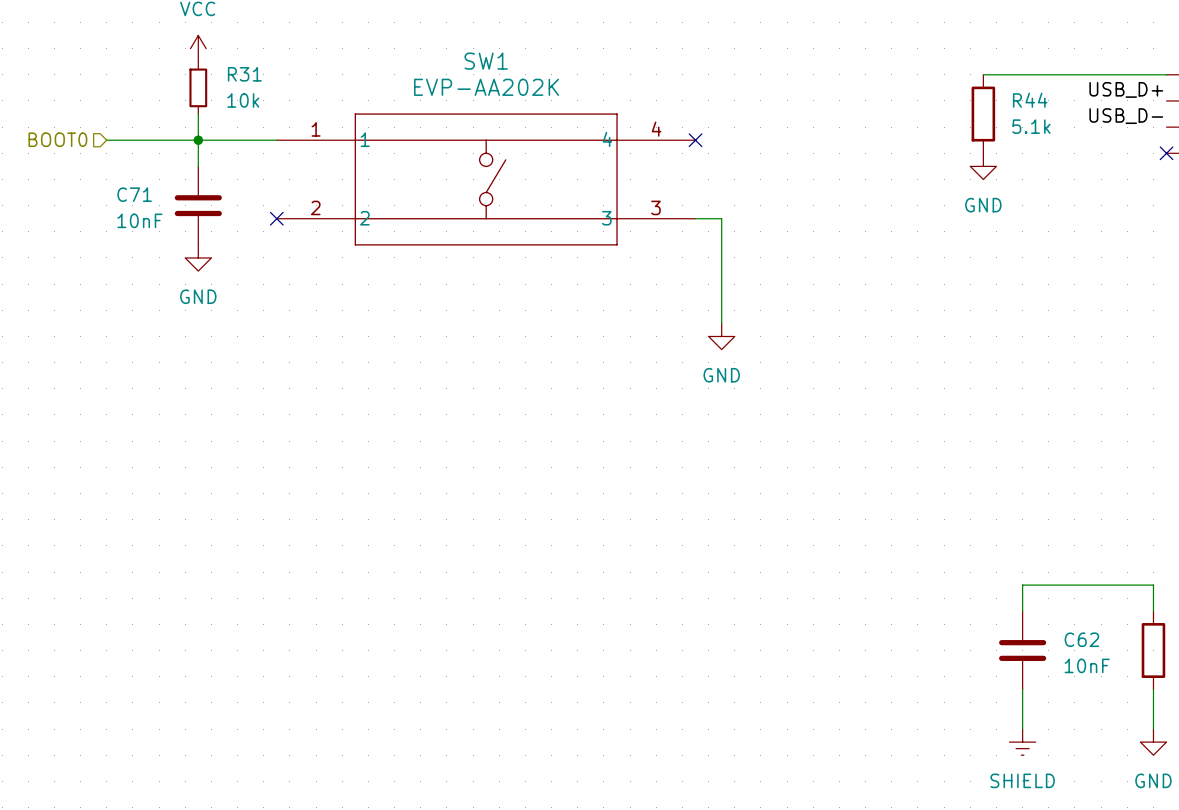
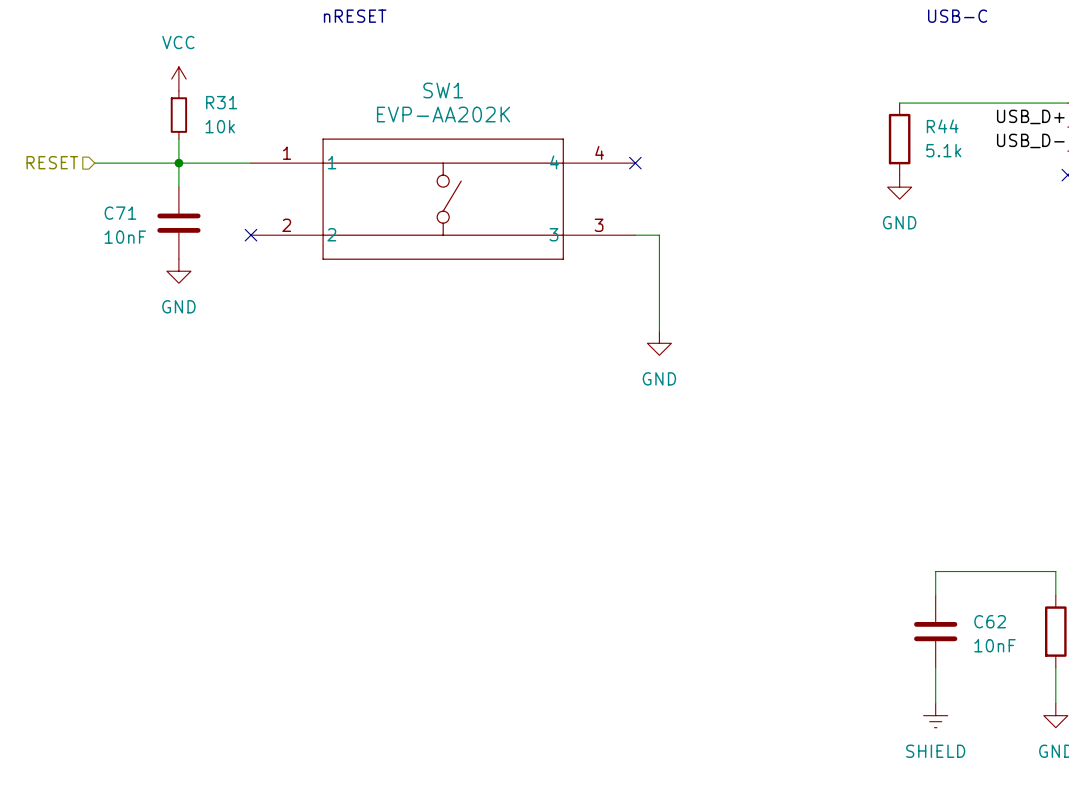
hierarchical label: BOOT0 (57, 139) -> RESET (52, 162)

